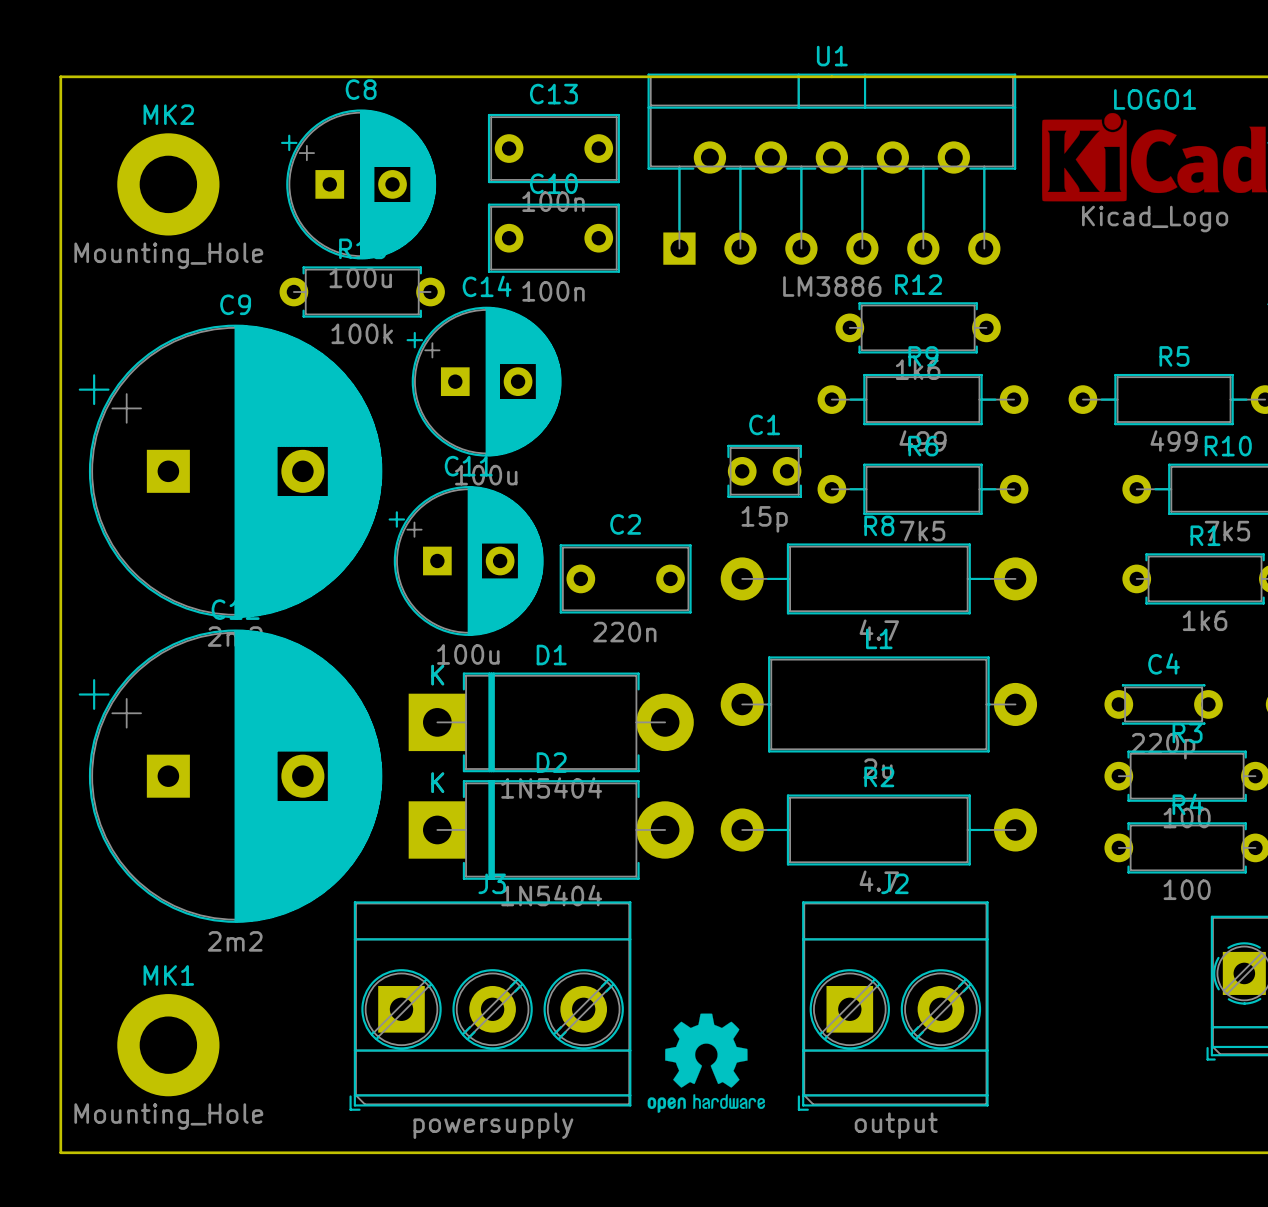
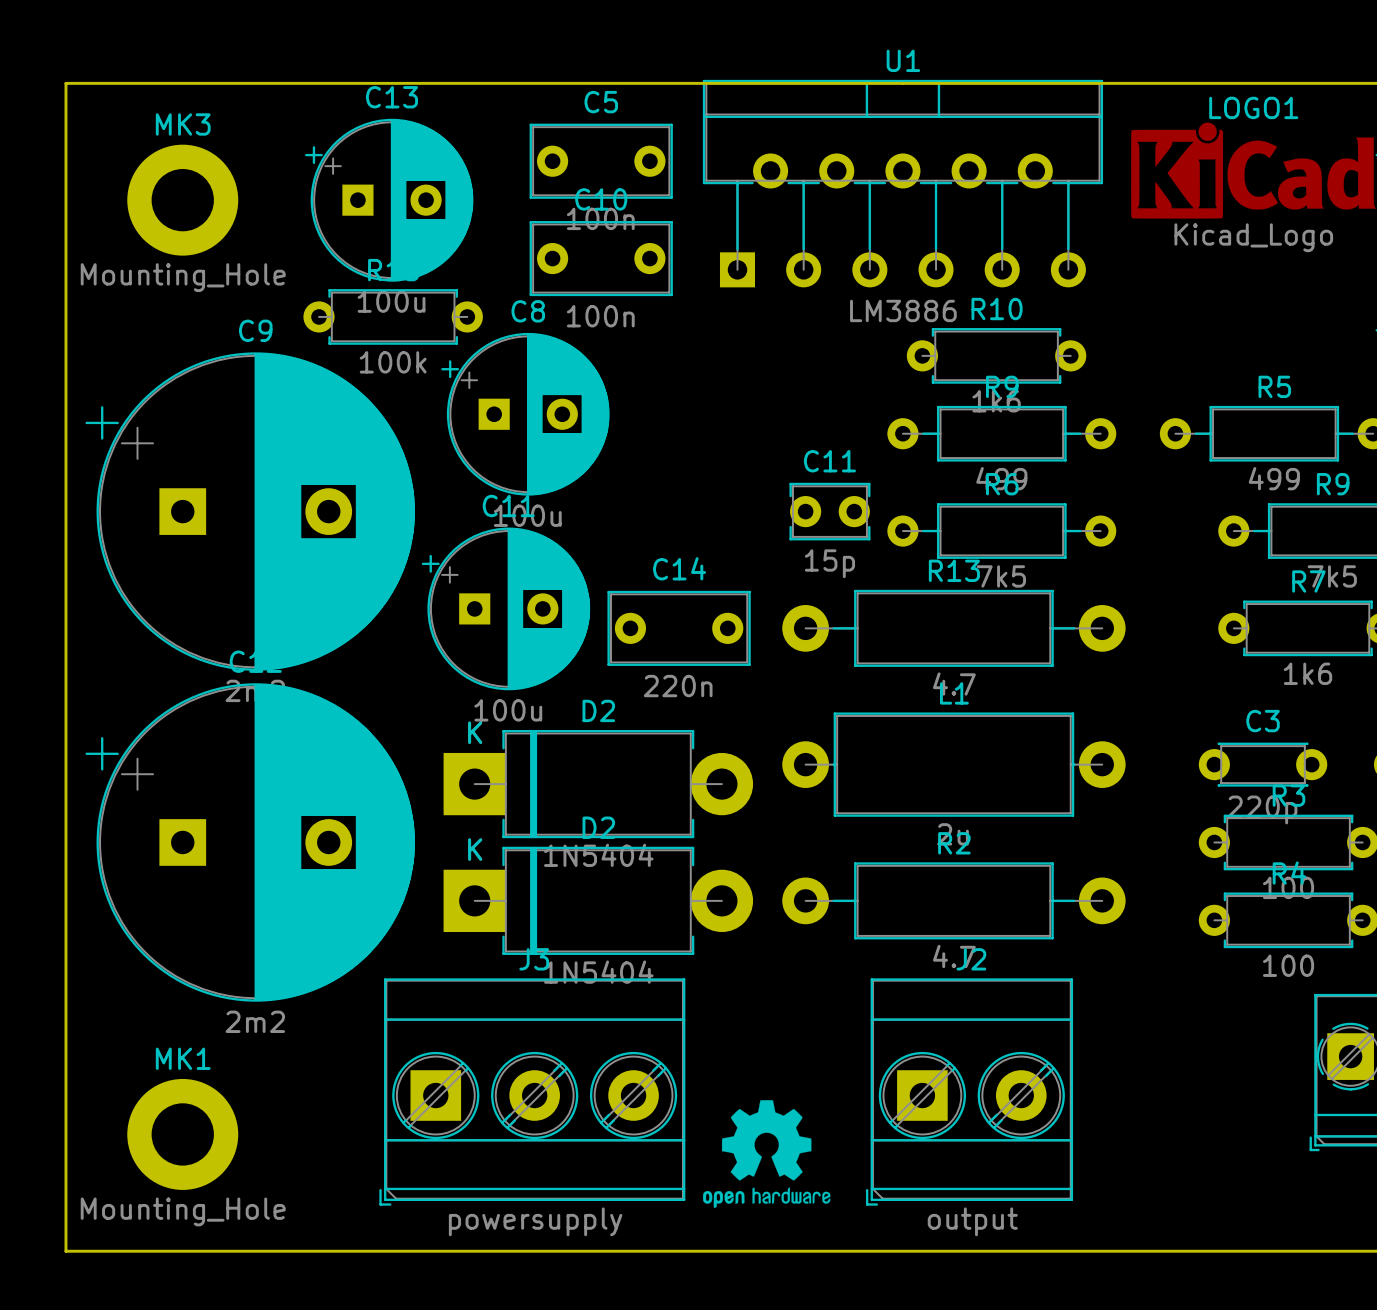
C8 name: C8 (361, 89) -> C13 (392, 97)
C13 name: C13 (553, 94) -> C5 (601, 102)
MK2 name: MK2 (168, 114) -> MK3 (183, 124)
R12 name: R12 (918, 284) -> R10 (997, 309)
C14 name: C14 (487, 286) -> C8 (528, 311)
C1 name: C1 (764, 424) -> C11 (829, 461)
R10 name: R10 (1228, 446) -> R9 (1333, 484)
C2 name: C2 (625, 524) -> C14 (679, 568)
R8 name: R8 (879, 525) -> R13 (954, 570)
R1 name: R1 (1205, 535) -> R7 (1308, 581)
D1 name: D1 (551, 655) -> D2 (598, 710)
C4 name: C4 (1164, 663) -> C3 (1263, 721)

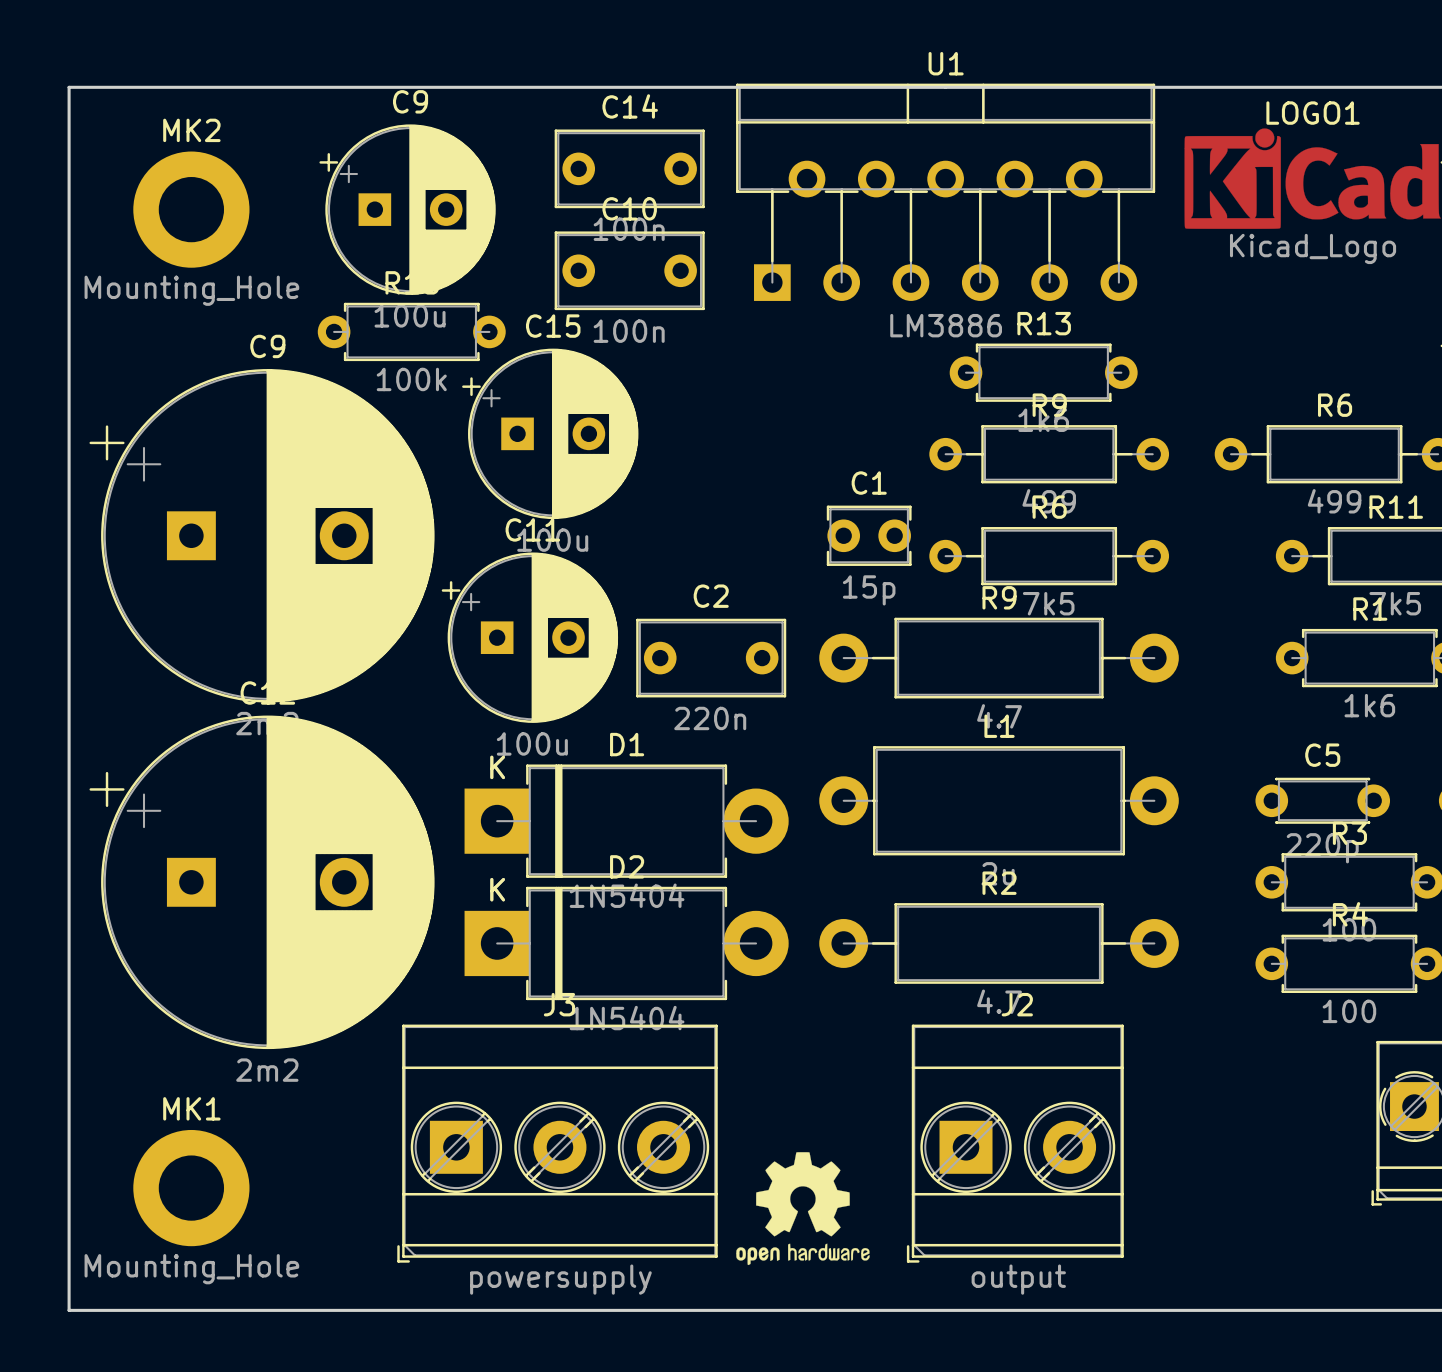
C13 name: C13 (392, 97) -> C9 (410, 101)
C5 name: C5 (601, 102) -> C14 (630, 106)
MK3 name: MK3 (183, 124) -> MK2 (191, 130)
R10 name: R10 (997, 309) -> R13 (1044, 323)
C8 name: C8 (528, 311) -> C15 (553, 326)
R5 name: R5 (1274, 386) -> R6 (1335, 405)
C11 name: C11 (829, 461) -> C1 (869, 483)
R9 name: R9 (1333, 484) -> R11 (1396, 507)
C14 name: C14 (679, 568) -> C2 (711, 596)
R13 name: R13 (954, 570) -> R9 (999, 597)
R7 name: R7 (1308, 581) -> R1 (1370, 609)
D2 name: D2 (598, 710) -> D1 (627, 744)
C3 name: C3 (1263, 721) -> C5 (1322, 755)

